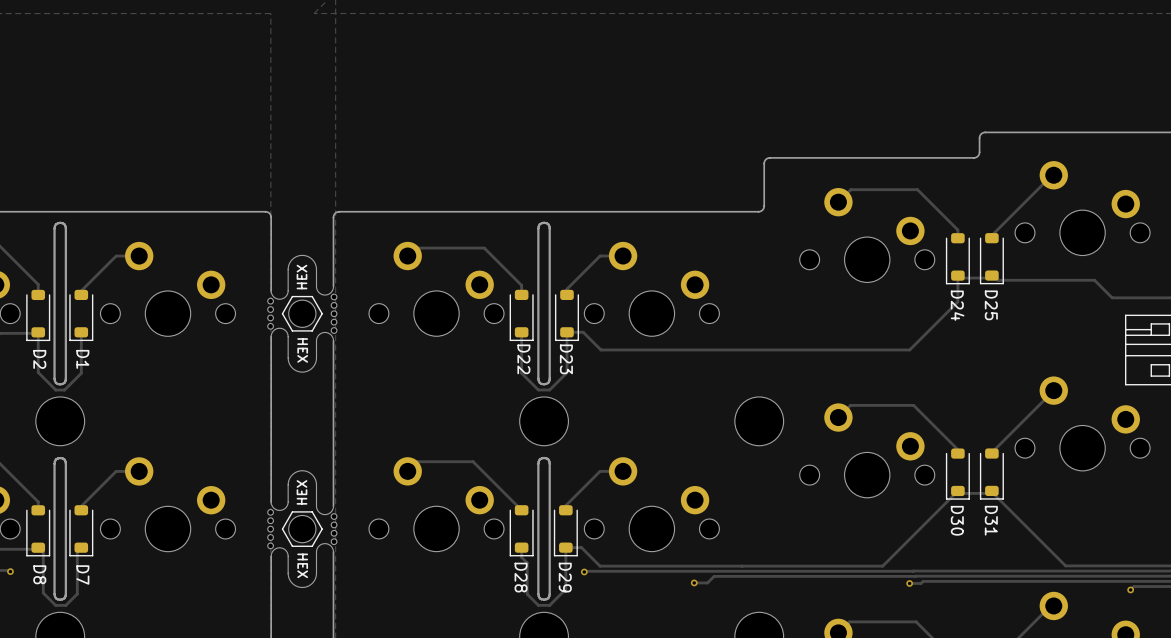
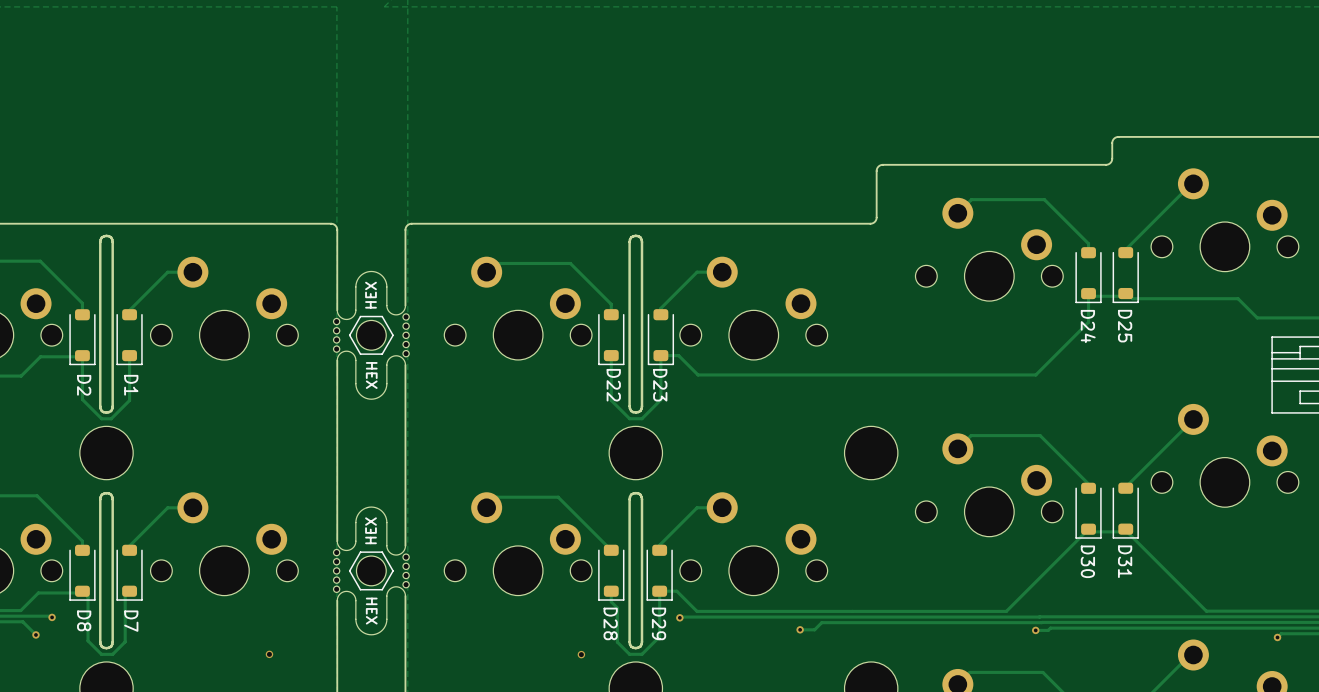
via: none -> (269, 654)
via: none -> (581, 654)

